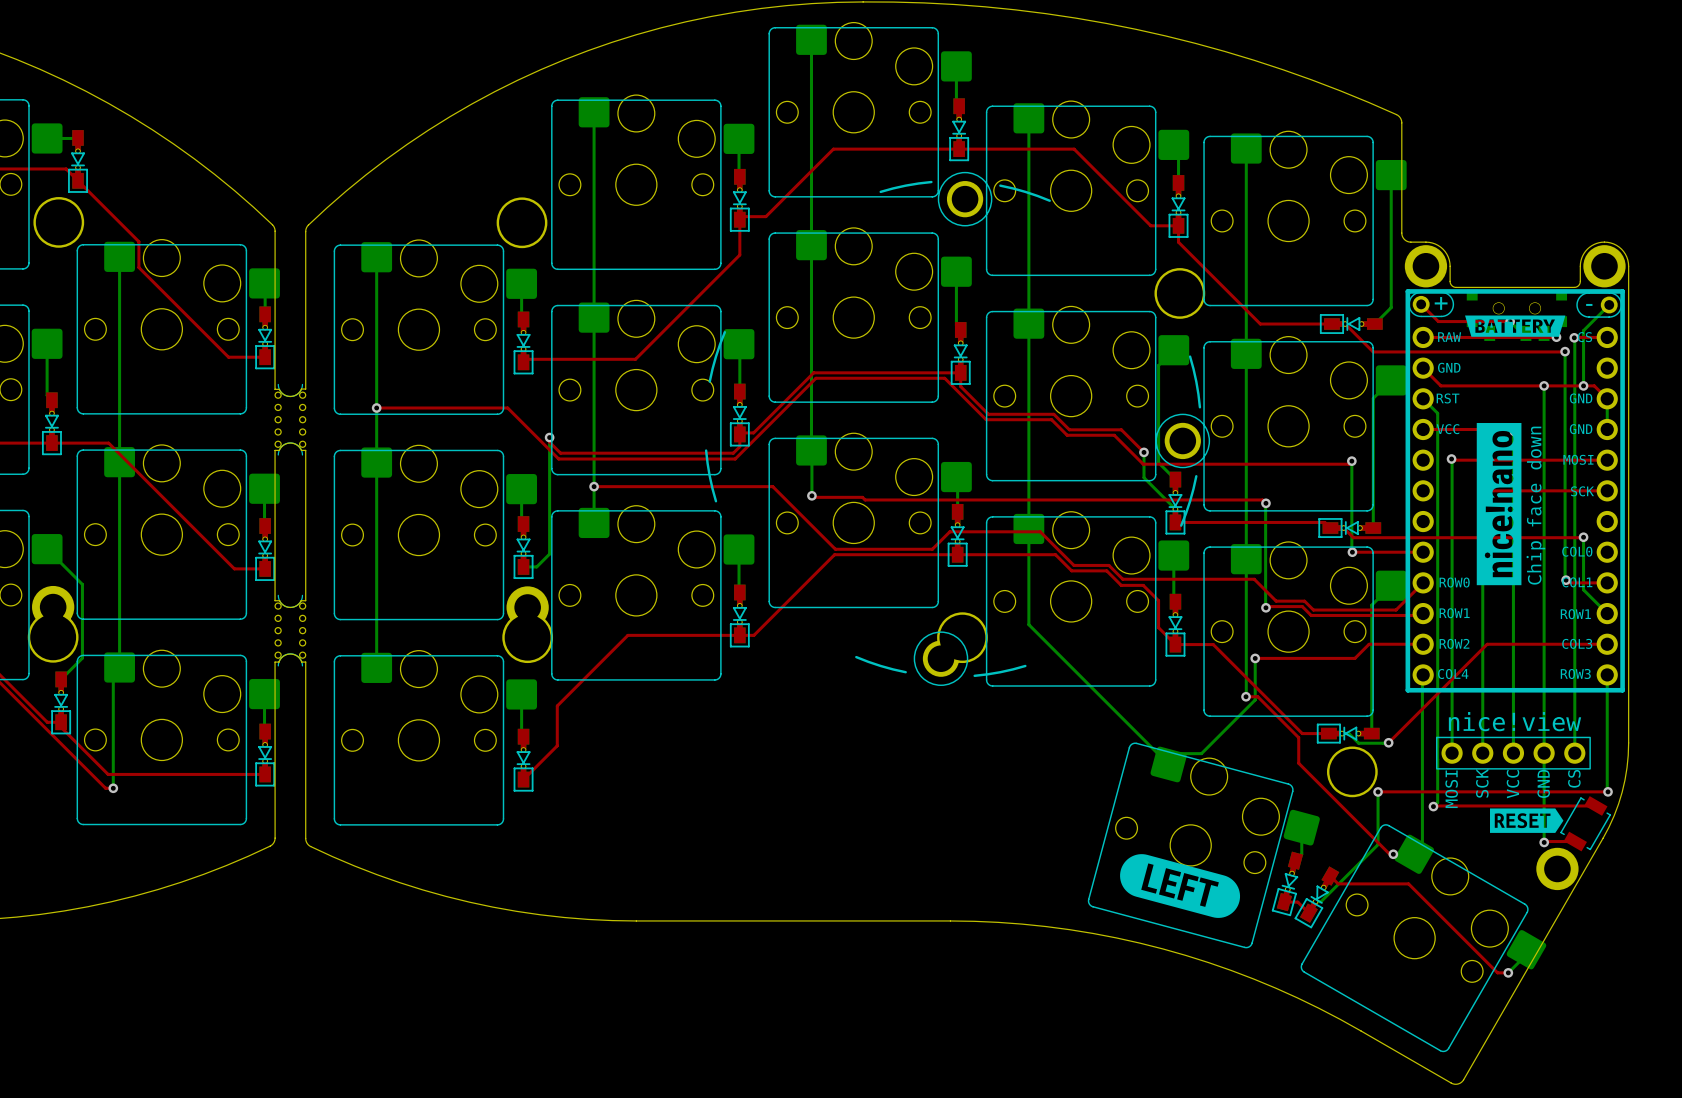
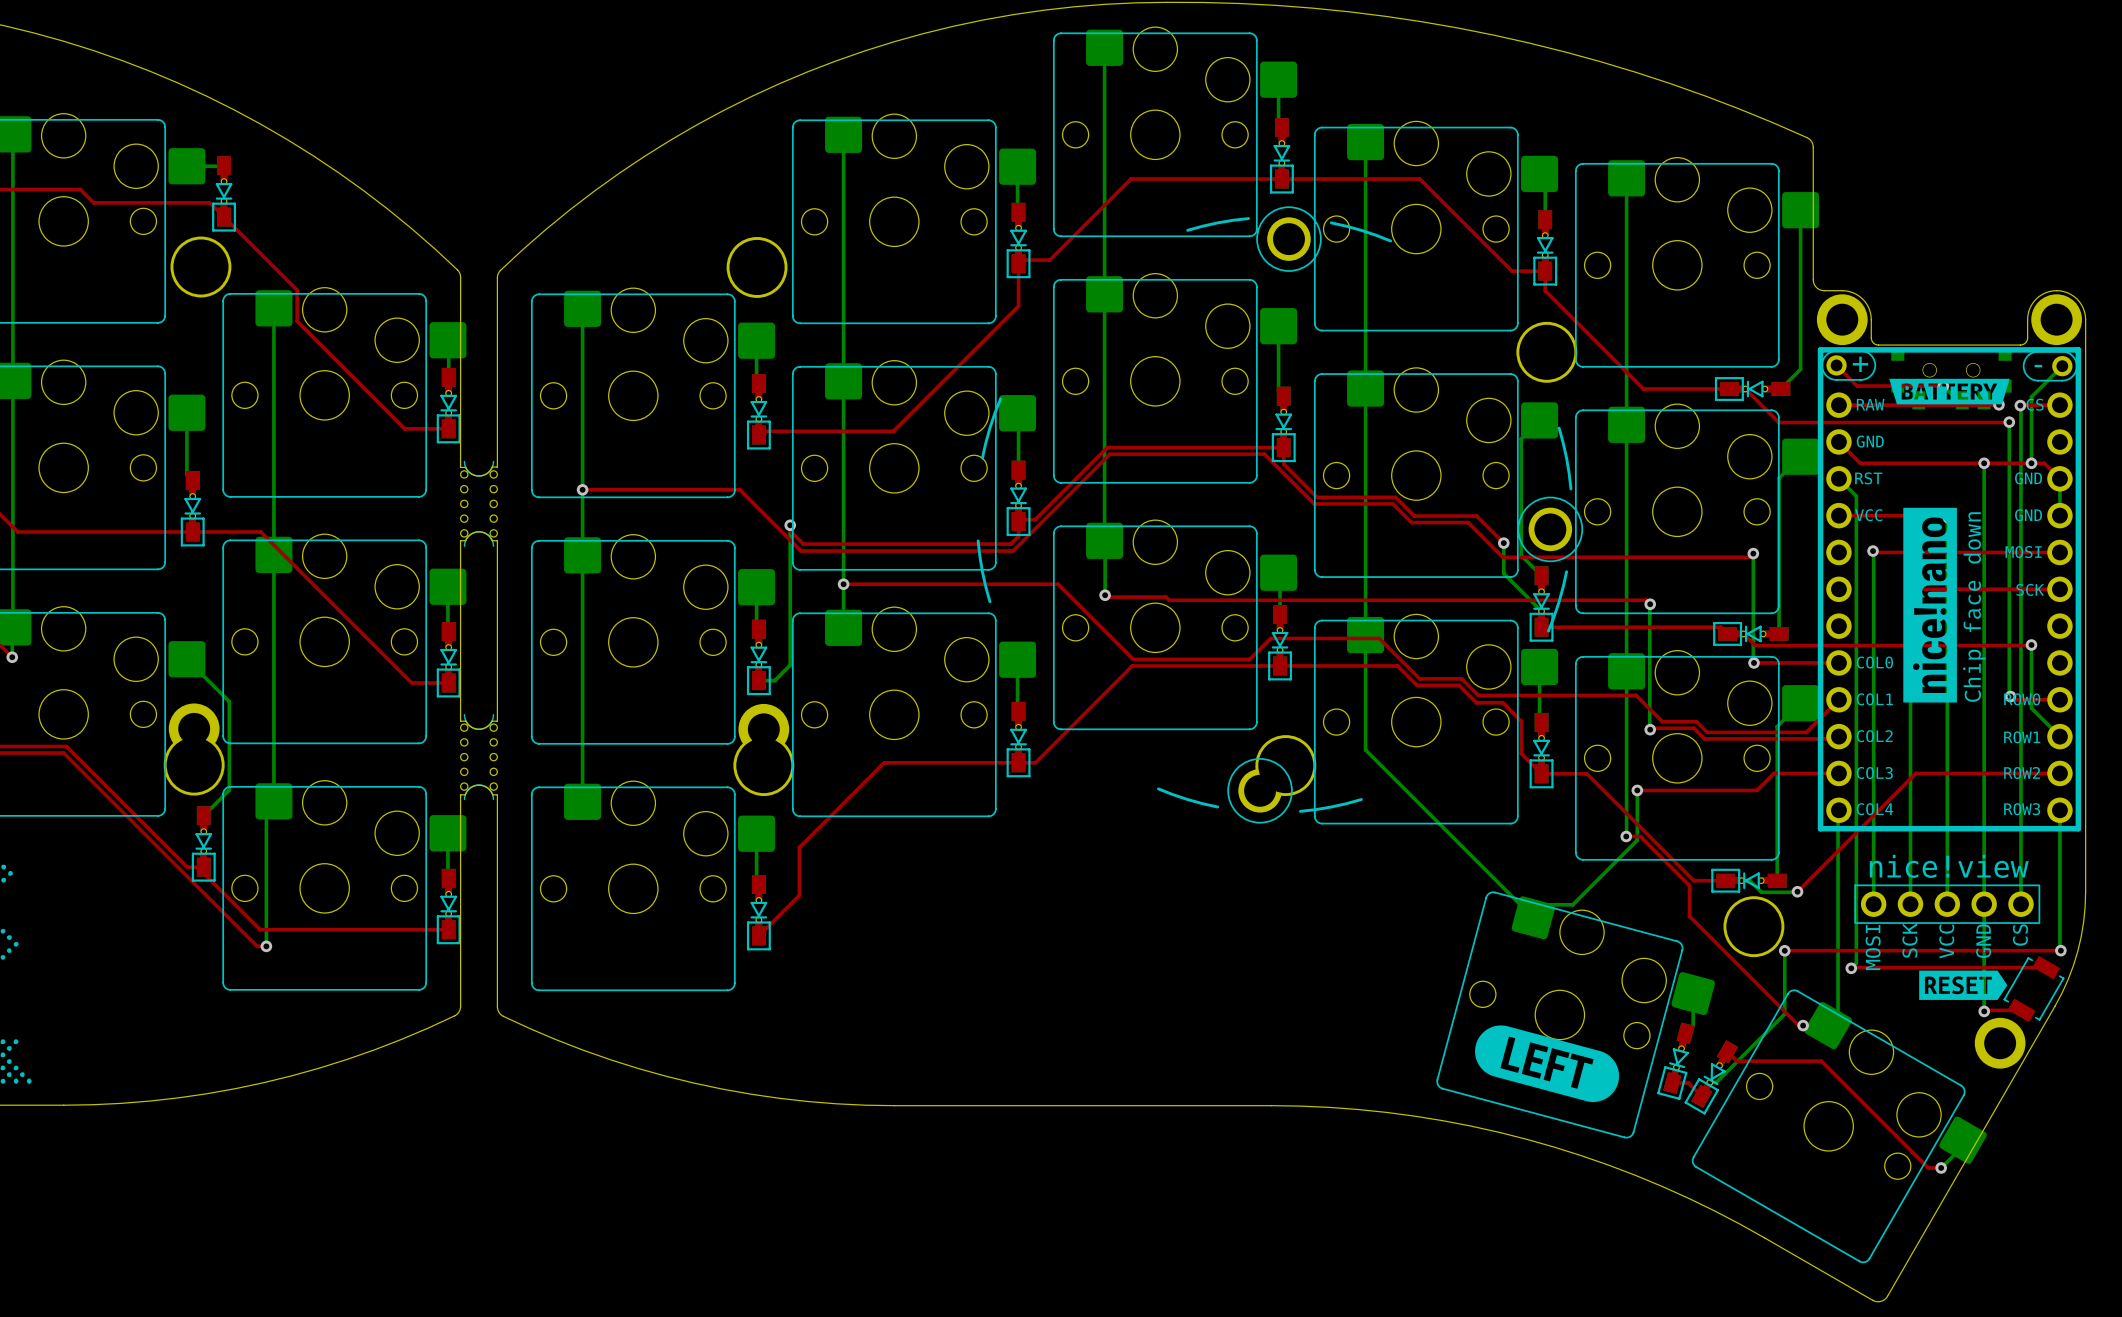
part footprint: [1405, 289, 1625, 693] -> [1817, 347, 2082, 832]

